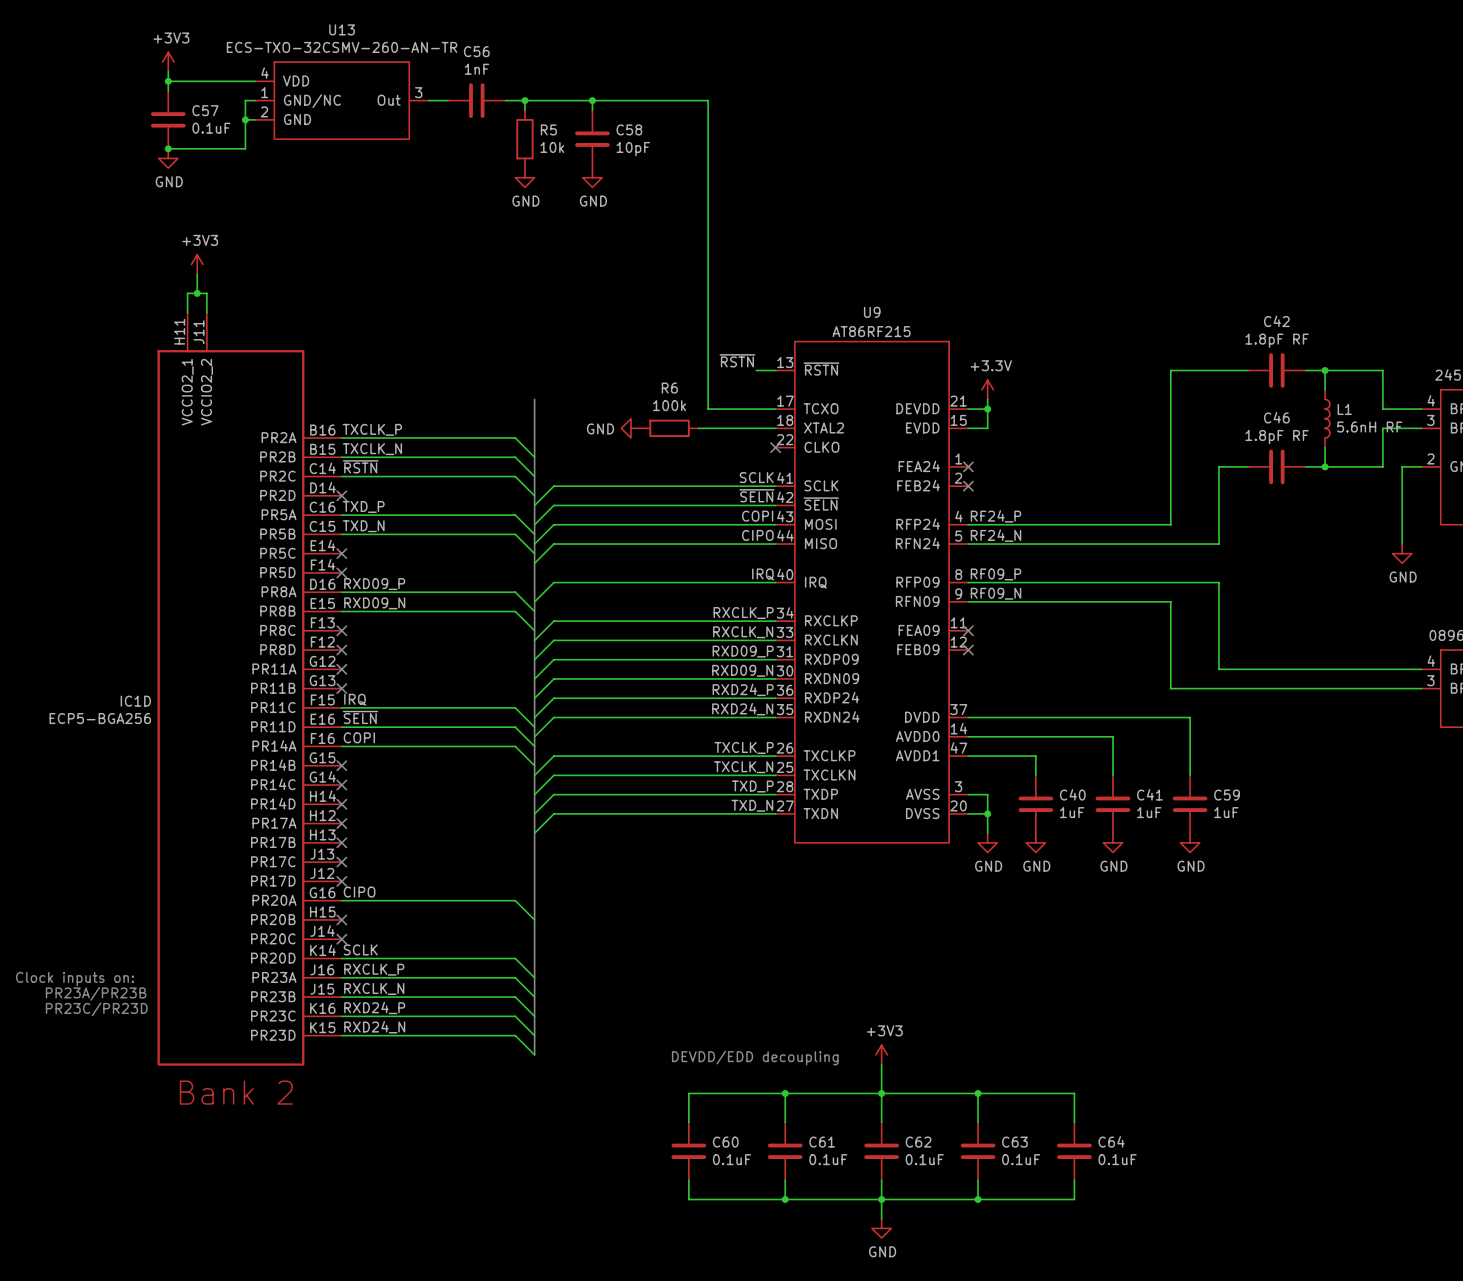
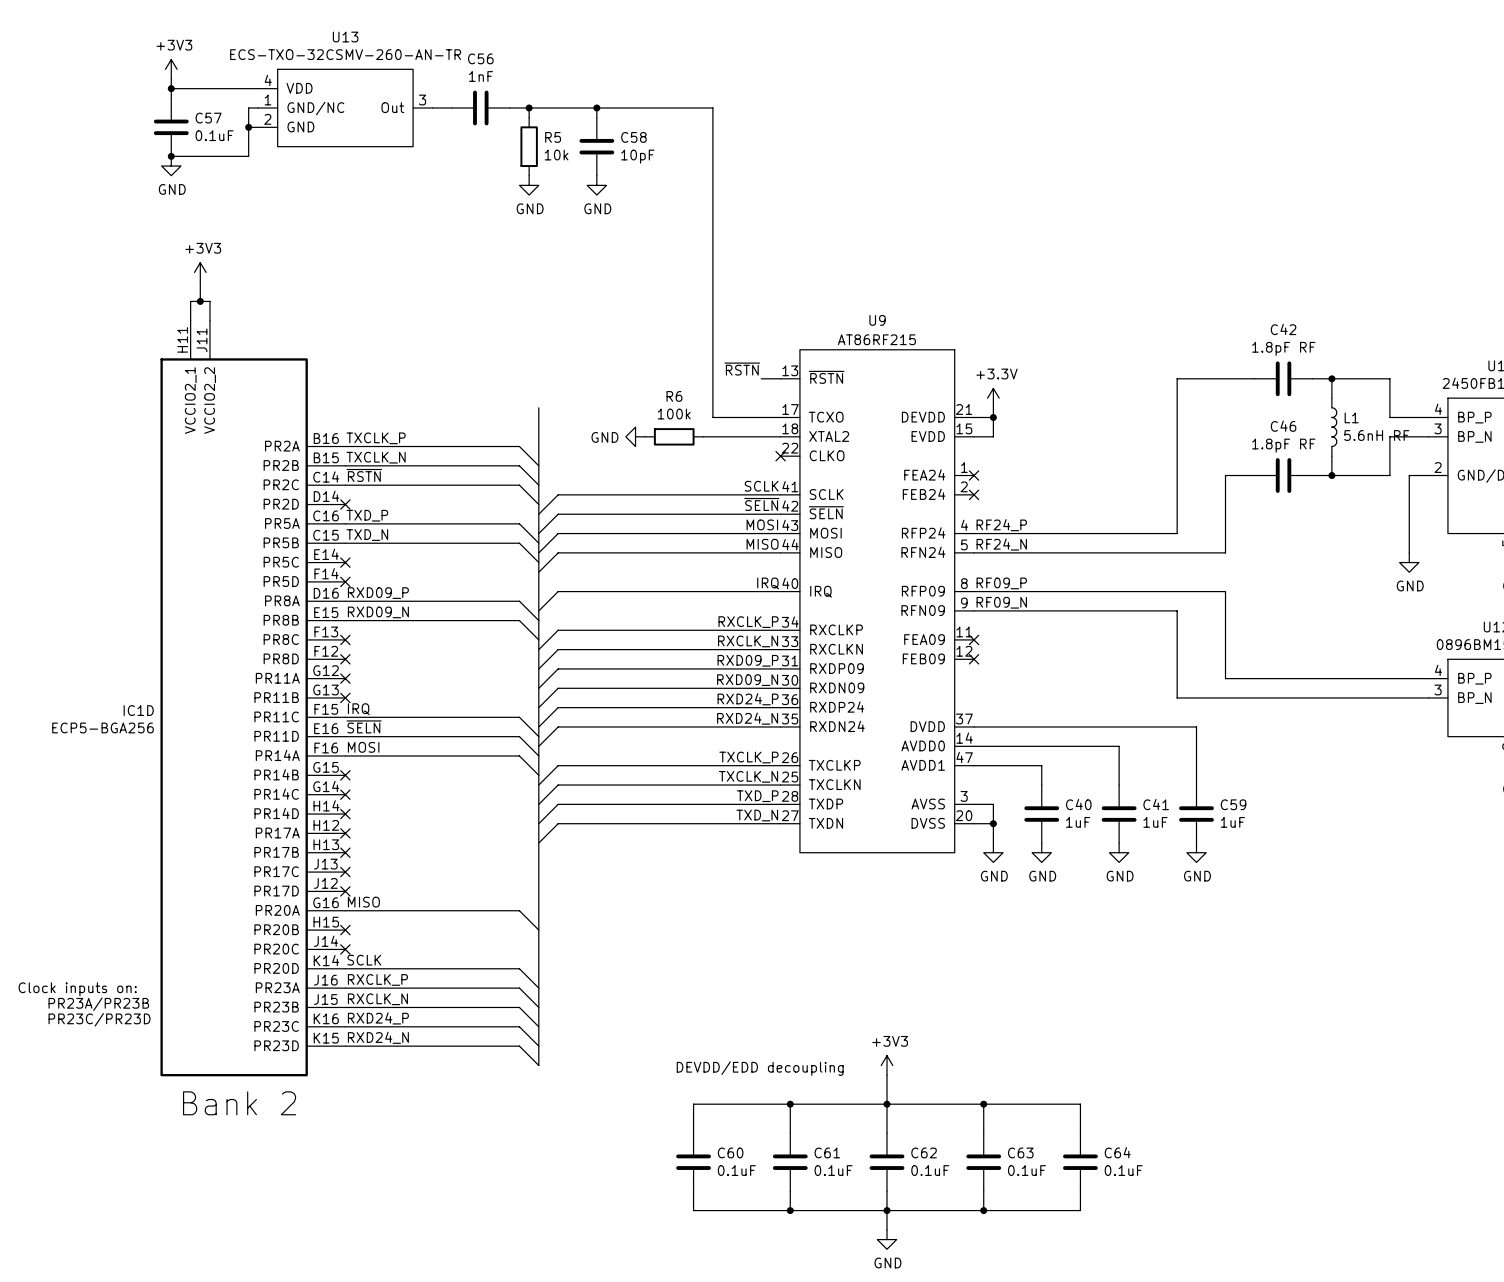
label: COPI (757, 516) -> MOSI (762, 524)
label: CIPO (757, 535) -> MISO (762, 544)
label: COPI (359, 737) -> MOSI (363, 747)
label: CIPO (359, 892) -> MISO (363, 902)

